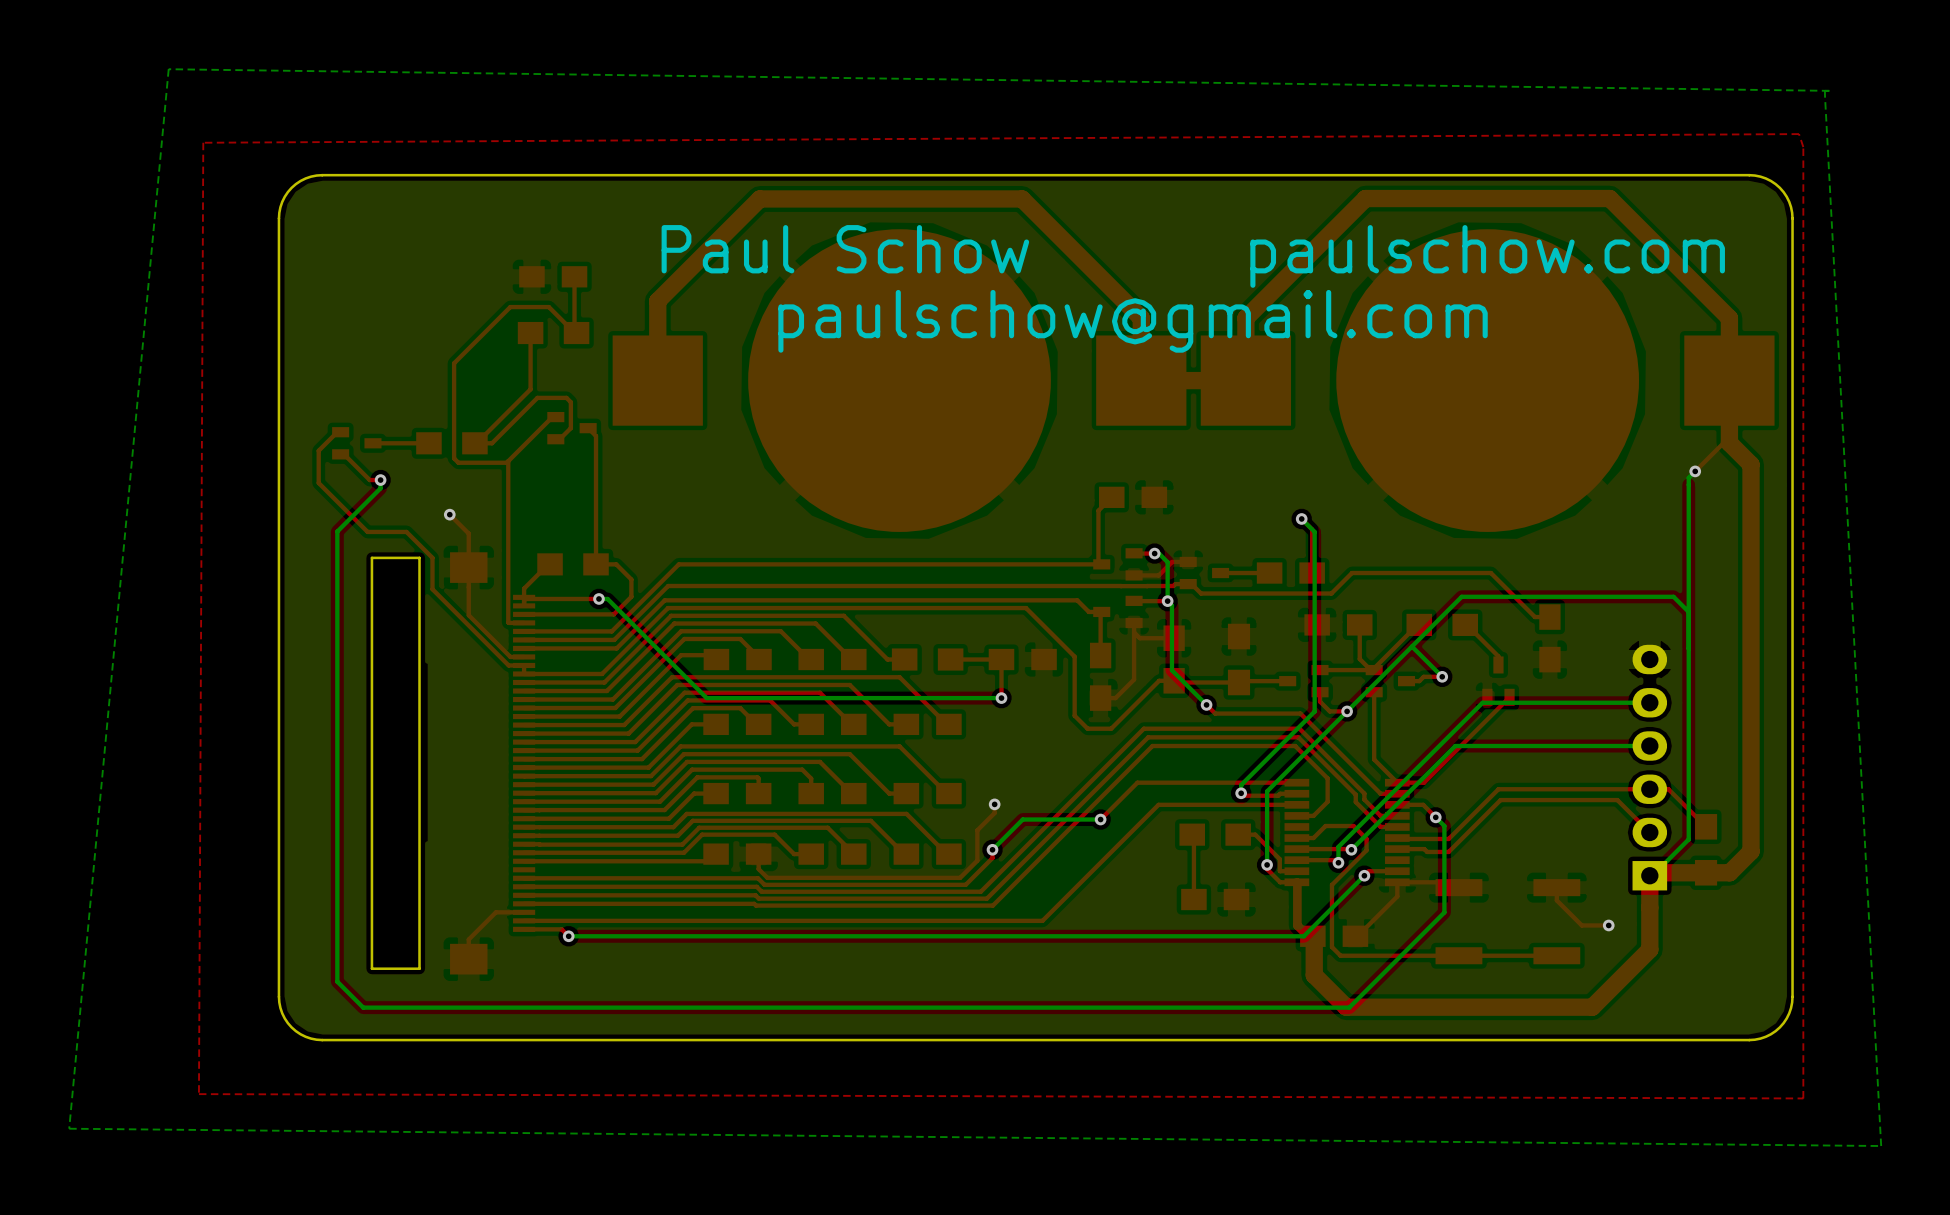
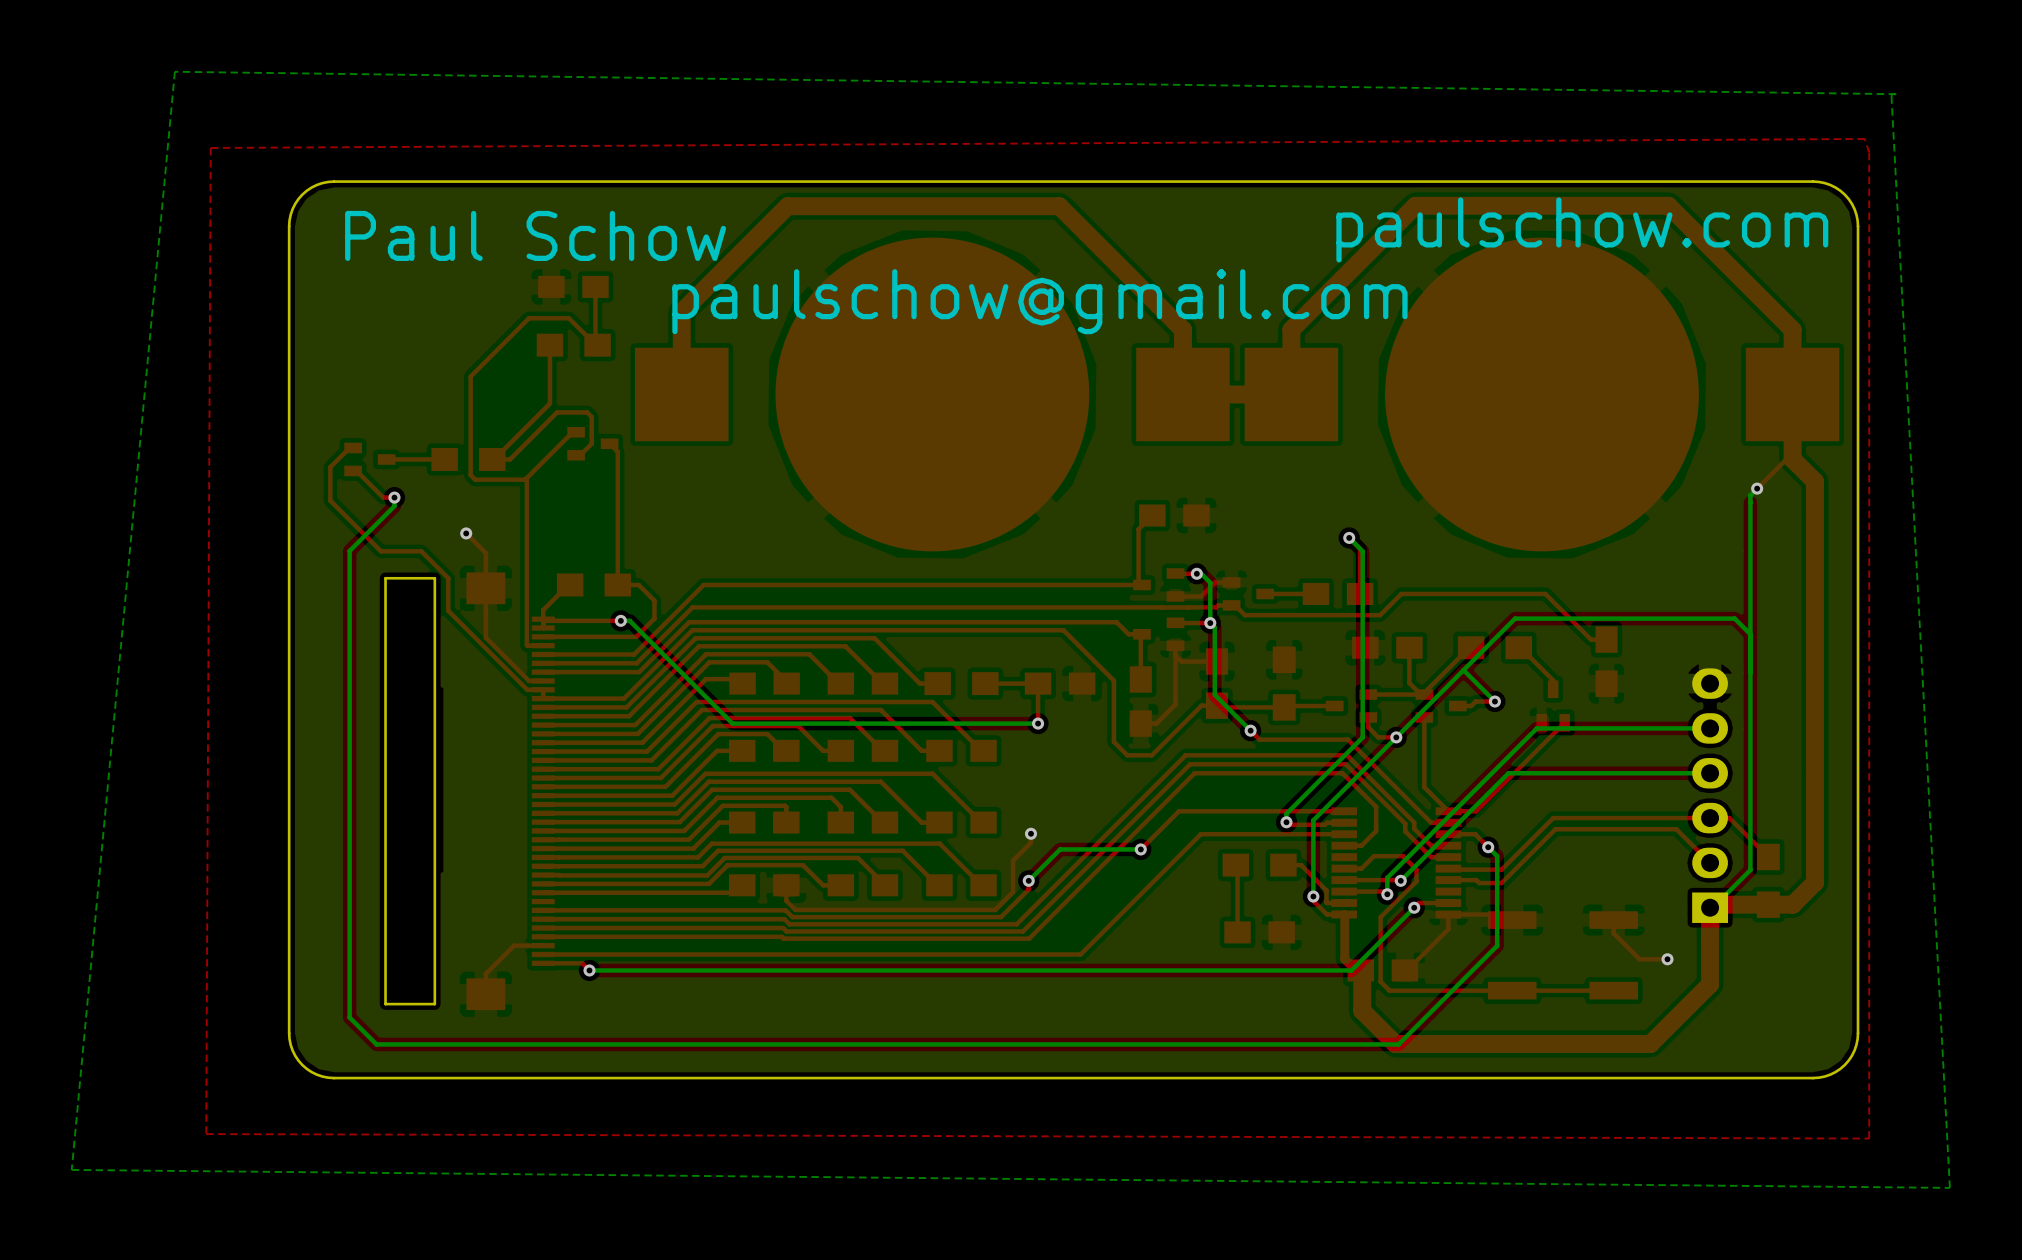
text position: Paul Schow (845, 249) -> Paul Schow (535, 235)
text position: paulschow.com (1487, 256) -> paulschow.com (1582, 229)
text position: paulschow@gmail.com (1133, 321) -> paulschow@gmail.com (1039, 301)

